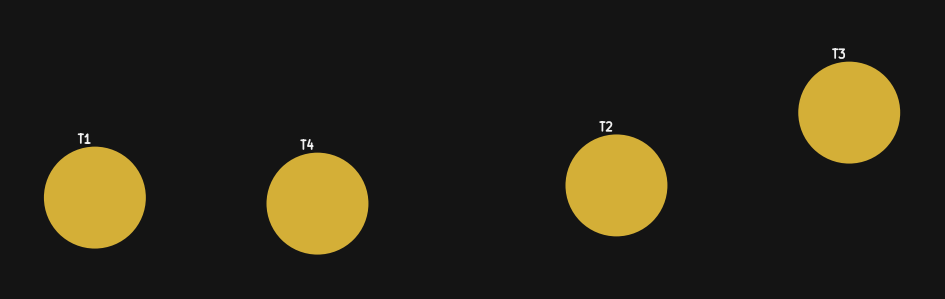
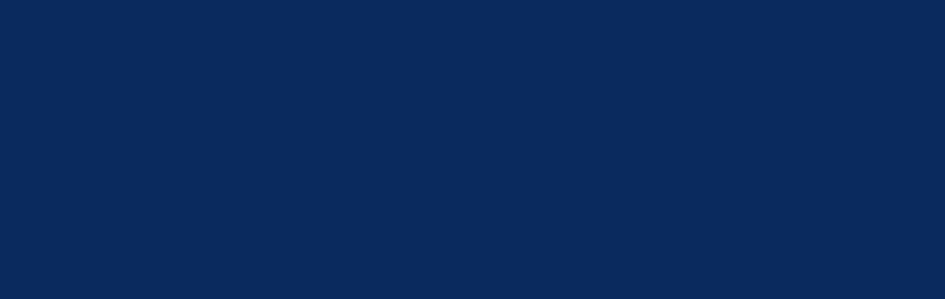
T3: (849, 112) -> none
T2: (616, 185) -> none
T1: (94, 197) -> none
T4: (317, 203) -> none

